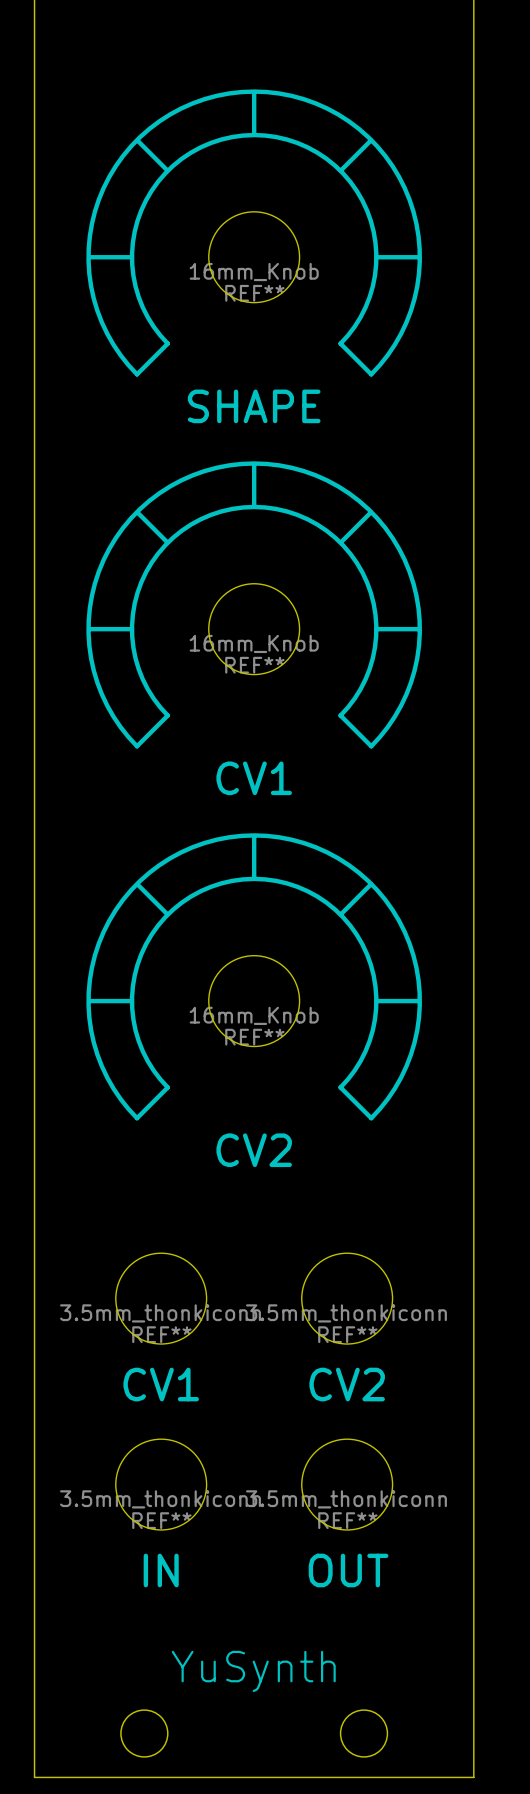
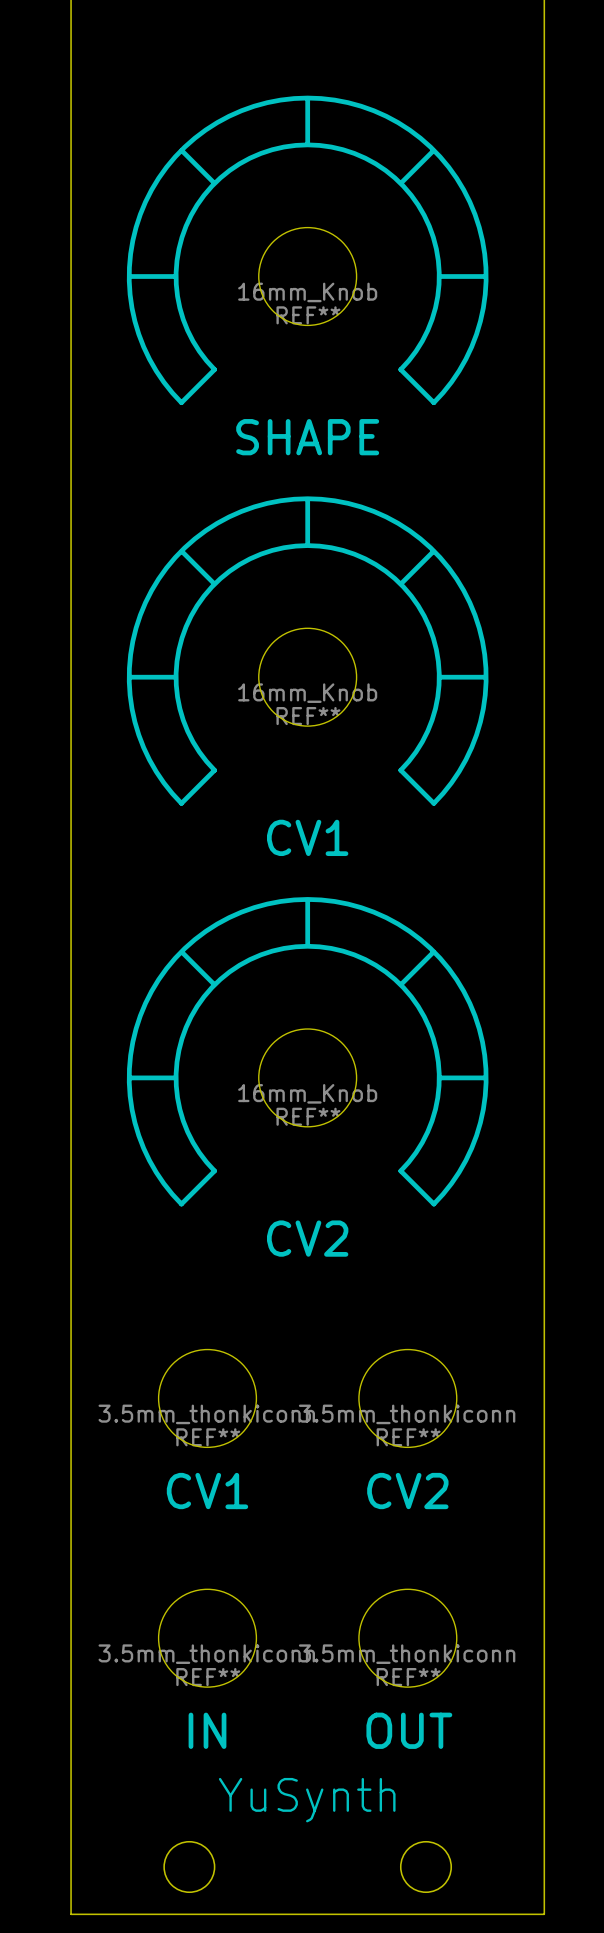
REF** position: (161, 1484) -> (207, 1638)
REF** position: (347, 1484) -> (407, 1638)

